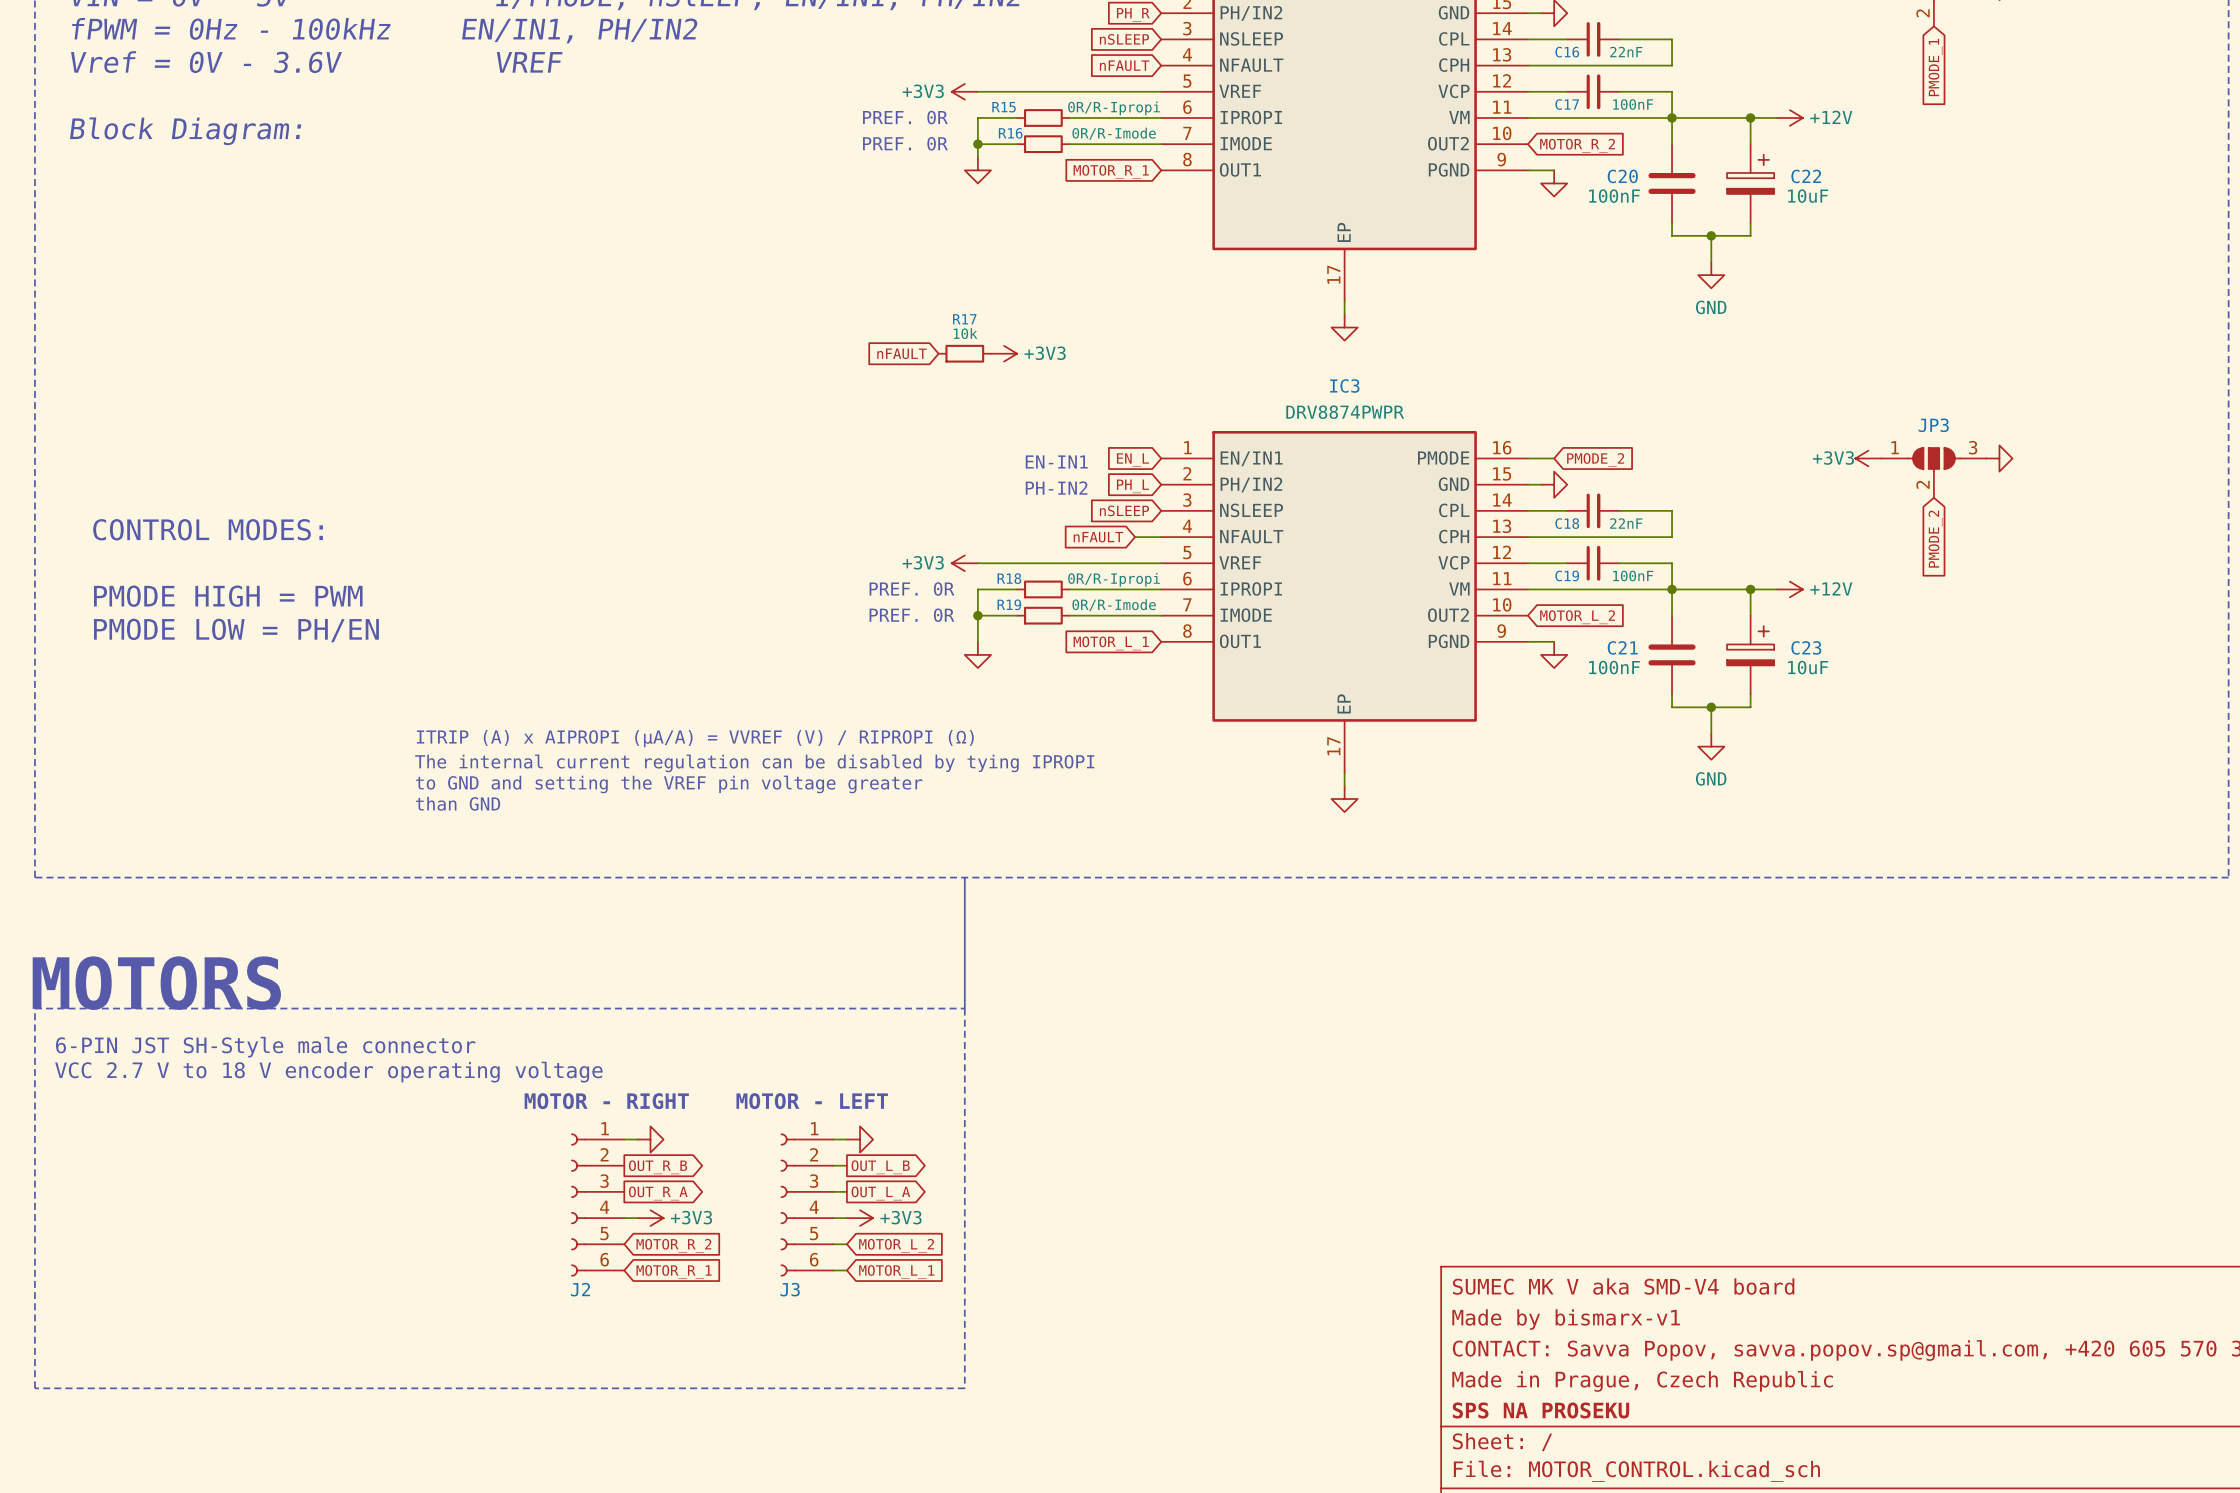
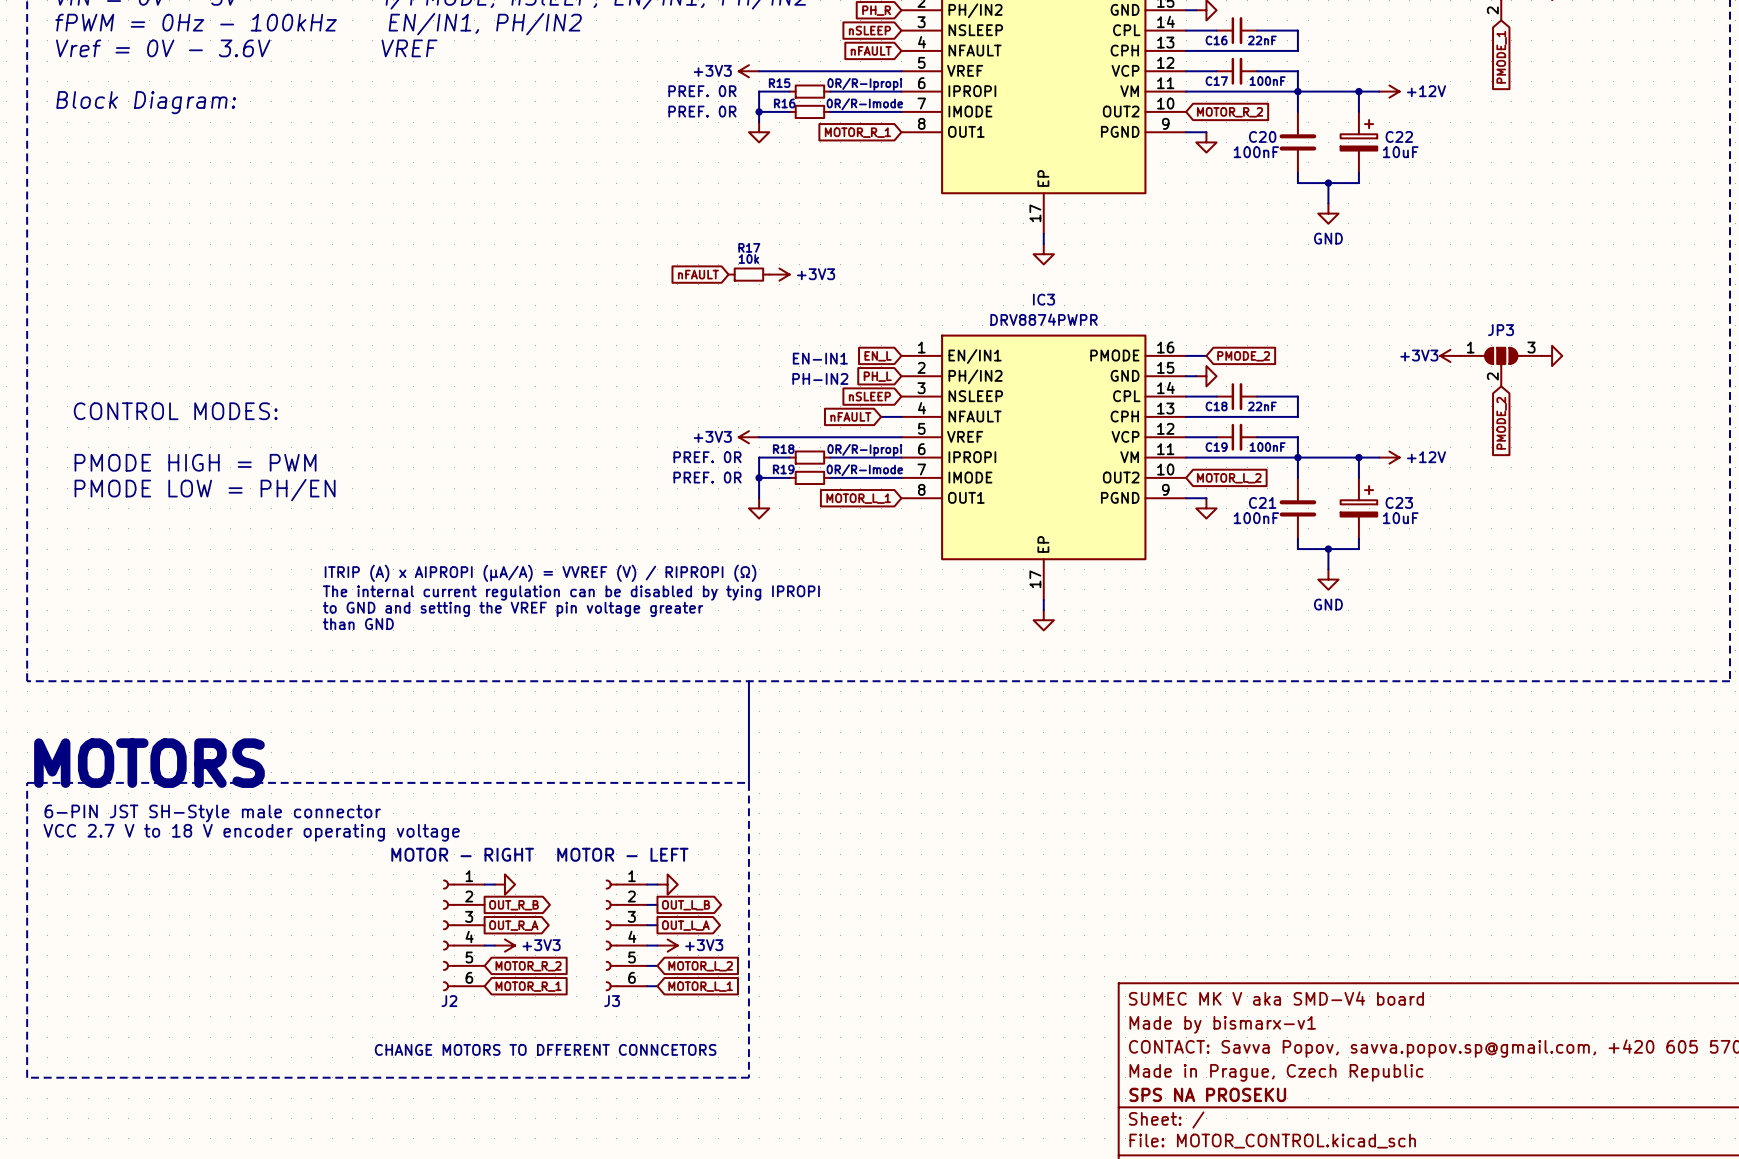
text: none -> CHANGE MOTORS TO DFFERENT CONNCETORS (545, 1049)

